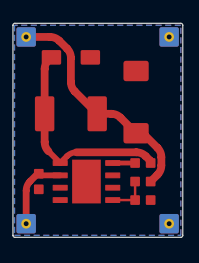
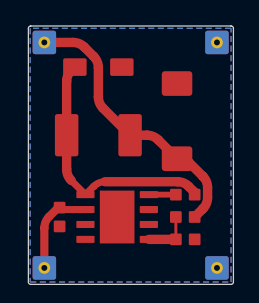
top track width: thin (135, 200) (112, 200) -> thick (175, 239) (148, 239)

